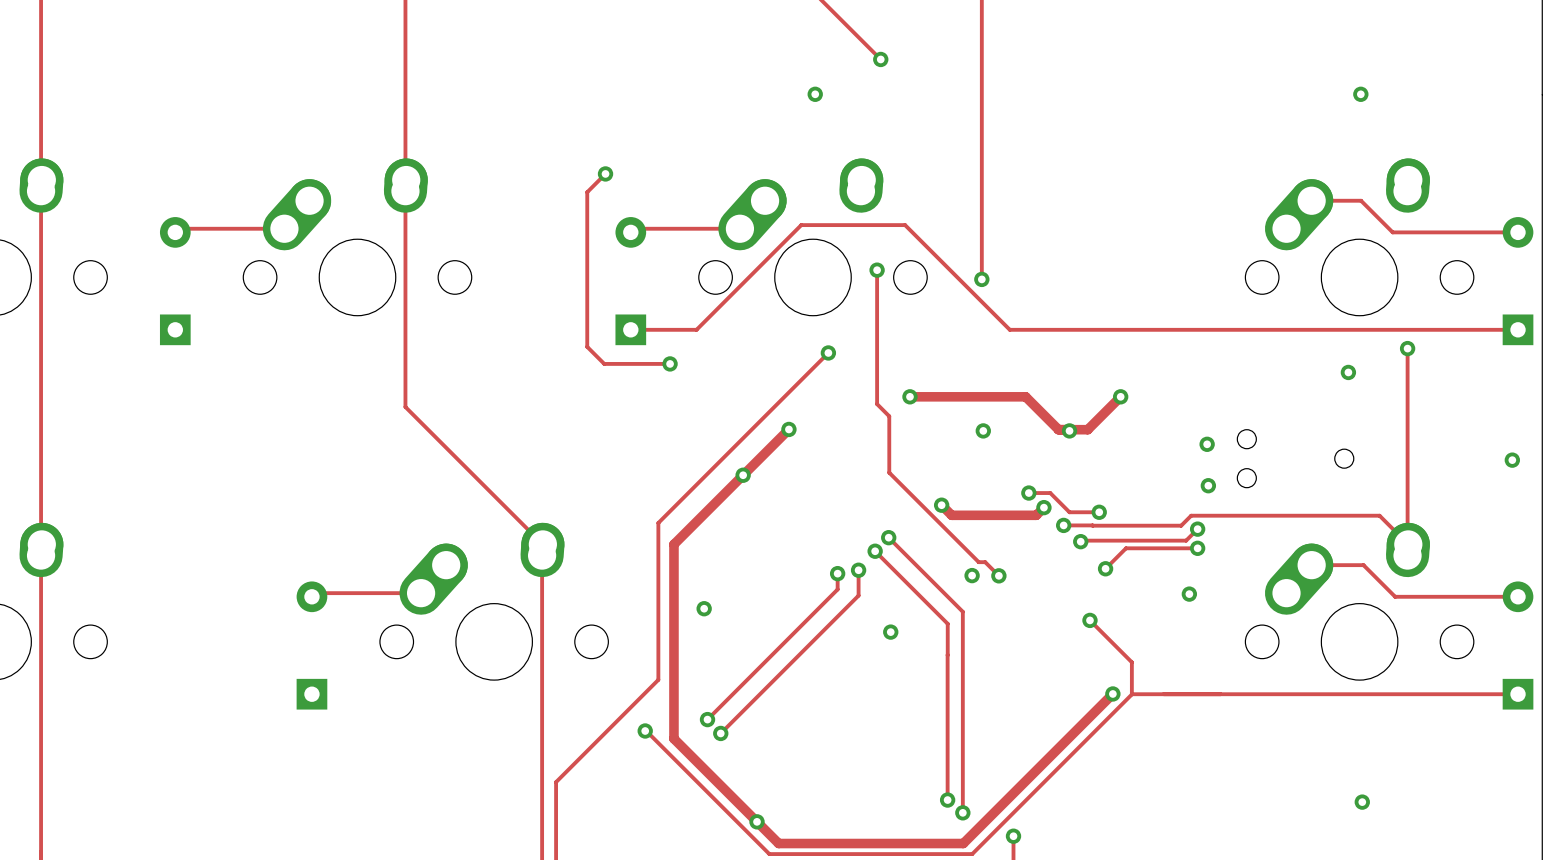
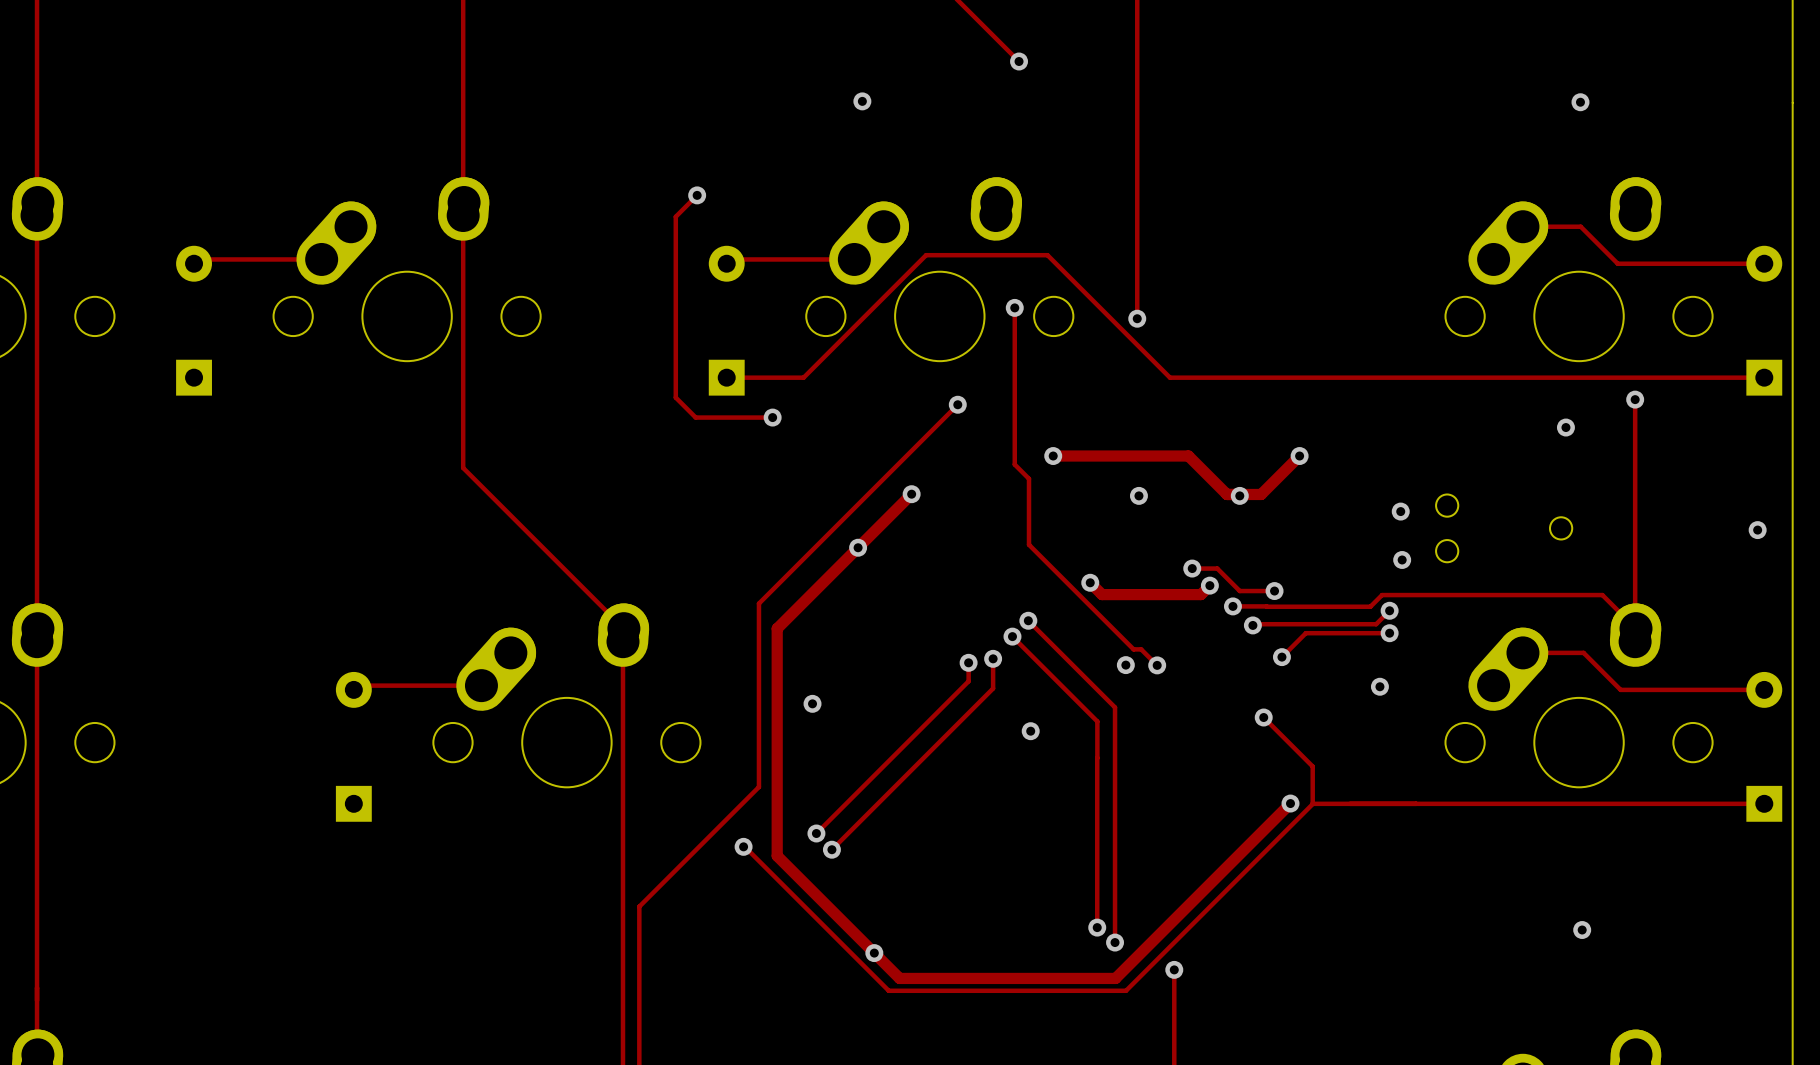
via position: (815, 94) -> (862, 101)

